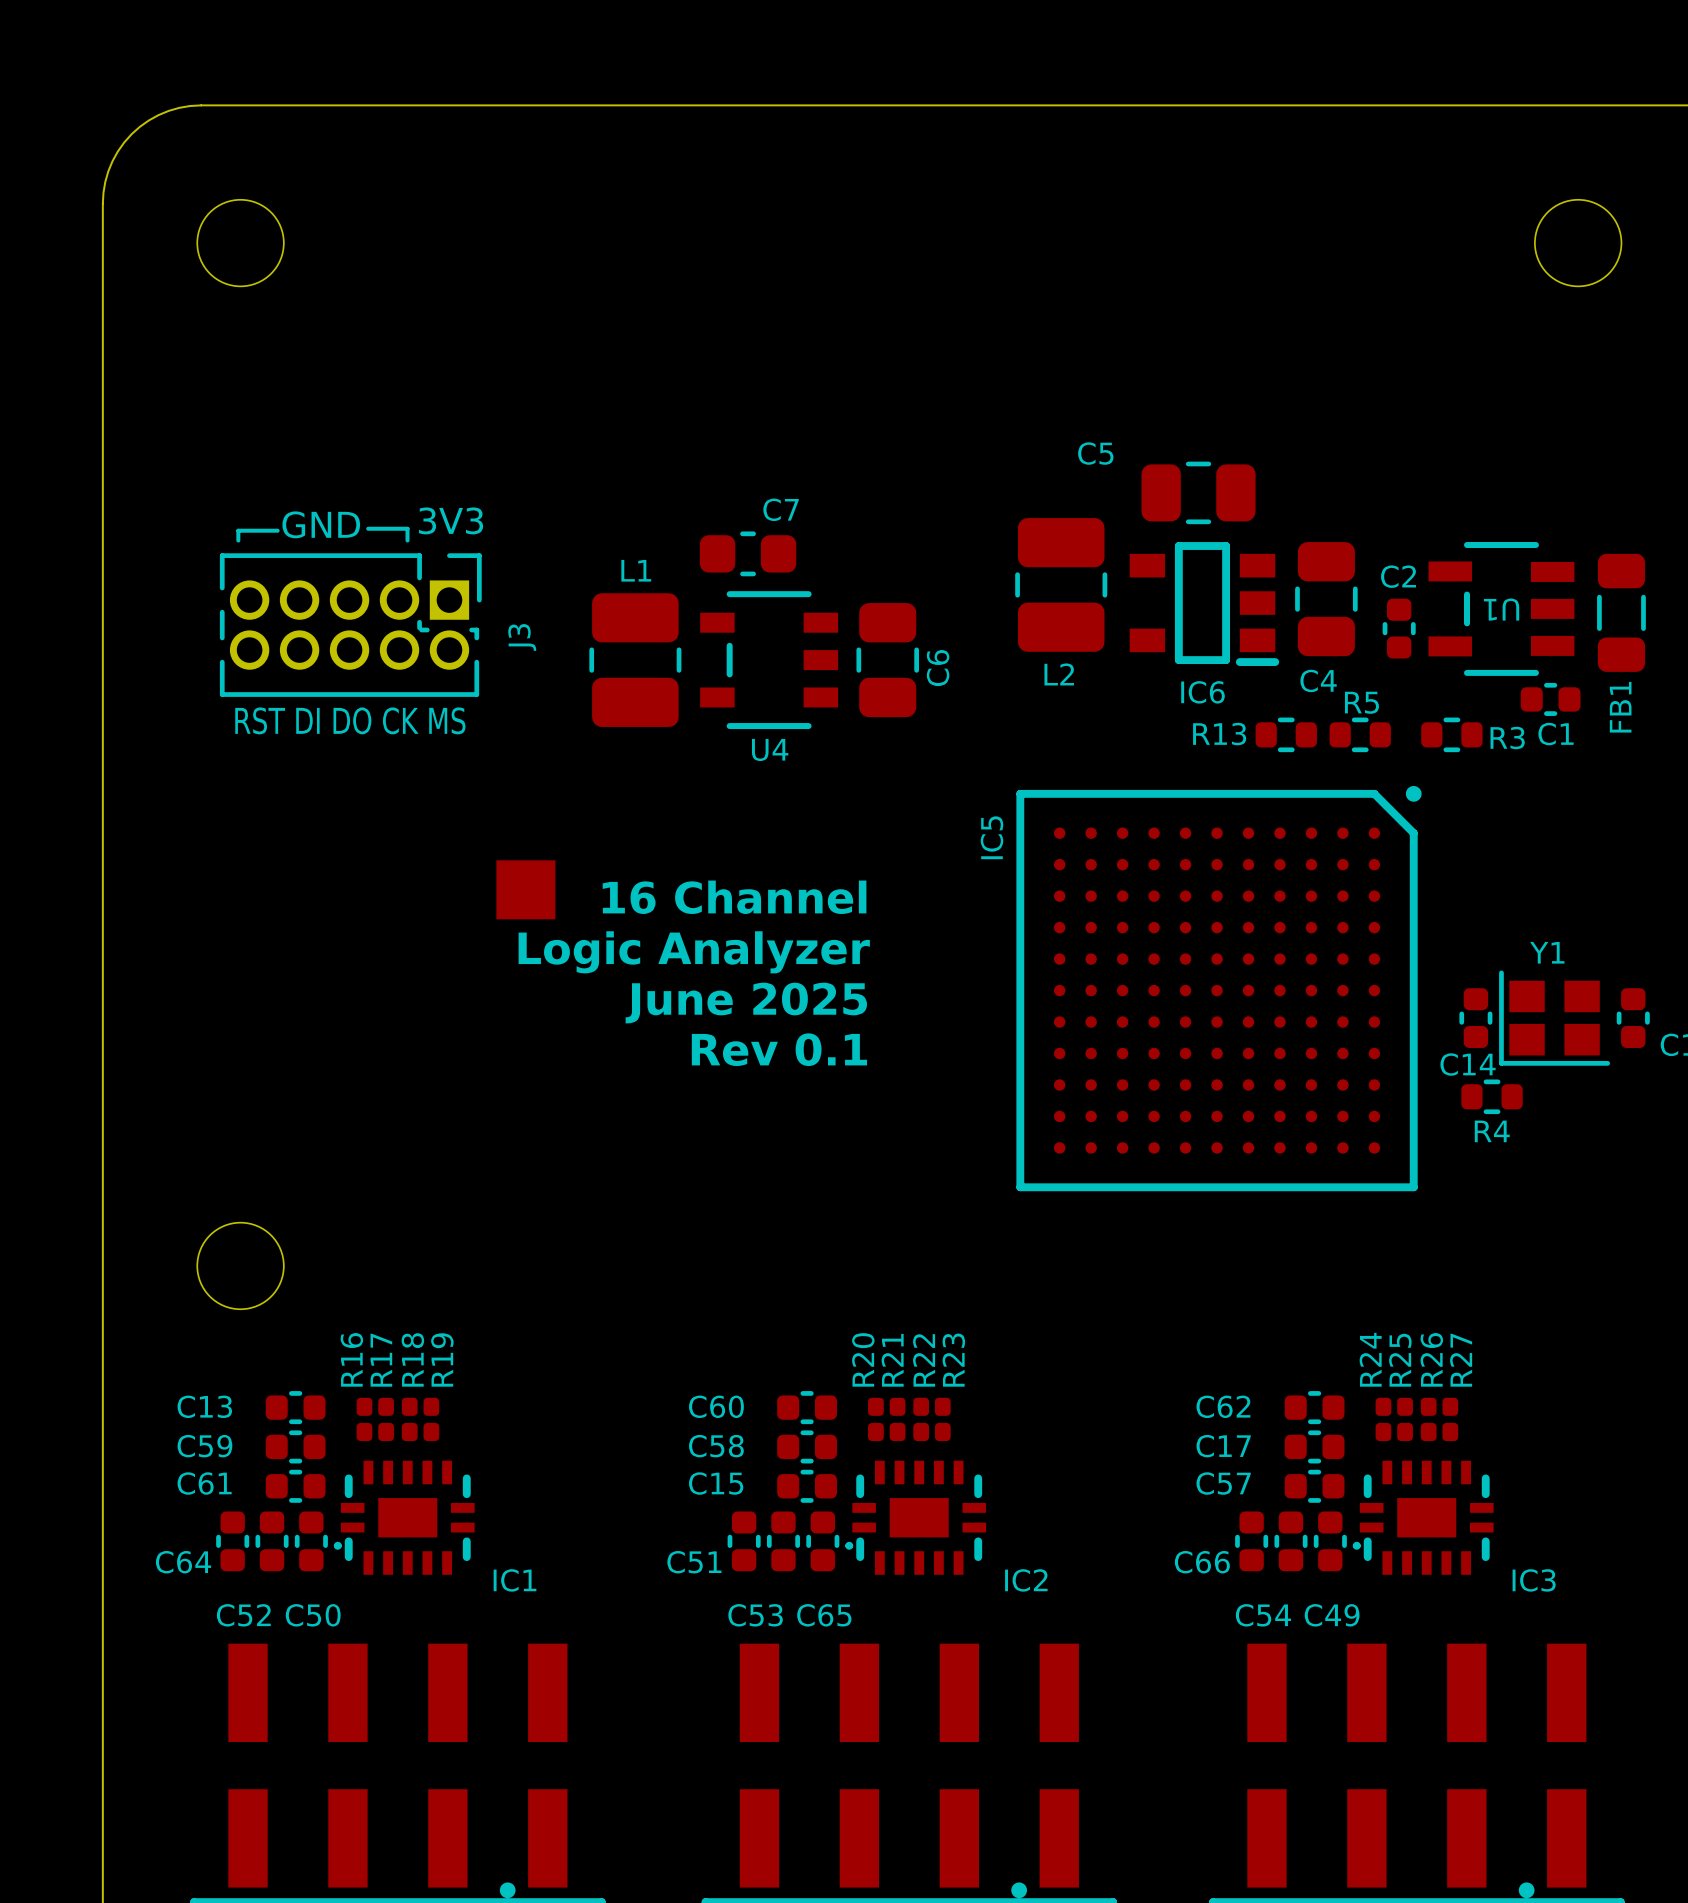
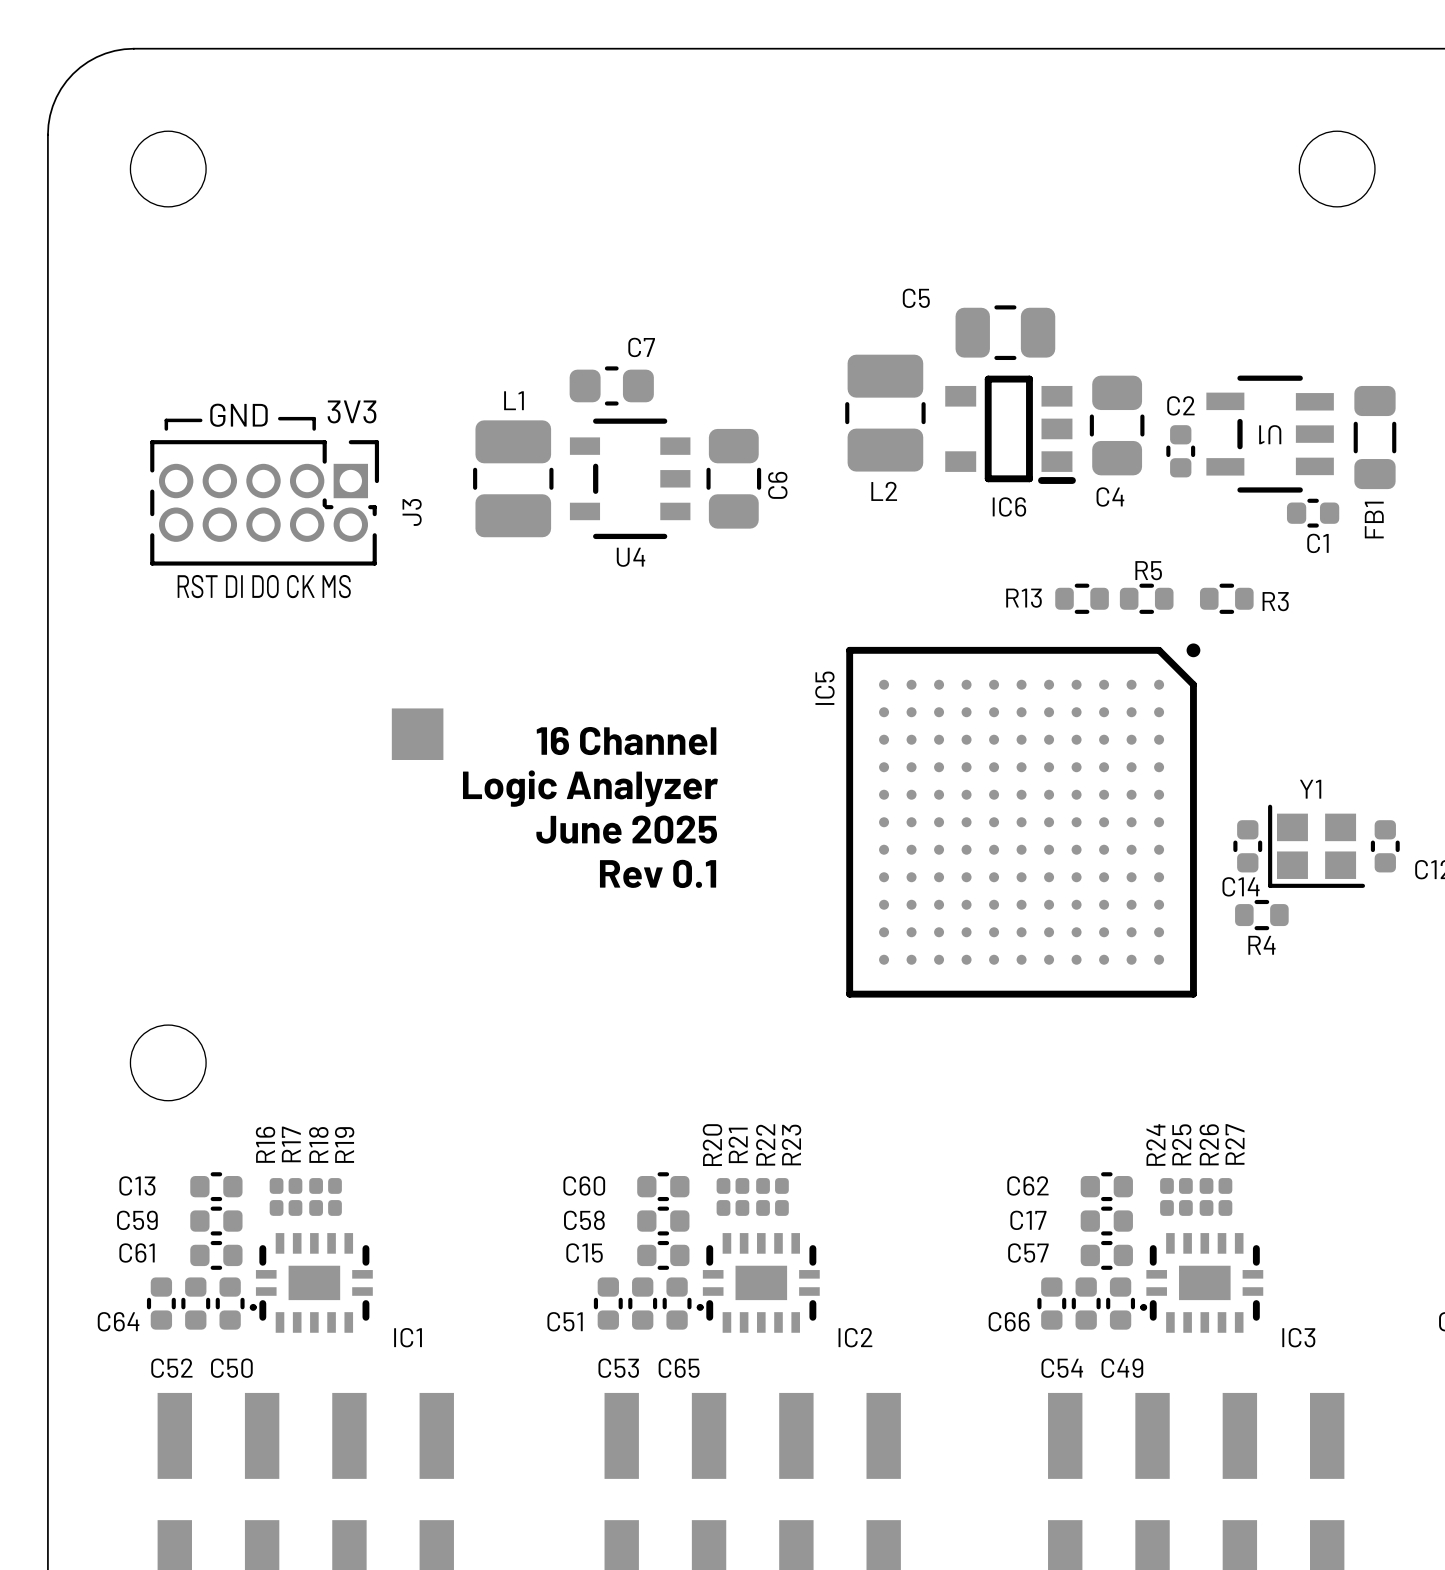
C5 position: (1198, 492) -> (1005, 332)
C7 position: (748, 553) -> (611, 385)
L2 position: (1061, 584) -> (885, 413)
C4 position: (1326, 599) -> (1117, 425)
IC6 position: (1204, 604) -> (1010, 429)
U1 position: (1501, 608) -> (1270, 434)
FB1 position: (1621, 612) -> (1374, 437)
C2 position: (1399, 628) -> (1180, 451)
L1 position: (635, 660) -> (513, 478)
U4 position: (769, 660) -> (630, 478)
C6 position: (887, 660) -> (733, 478)
C1 position: (1550, 699) -> (1313, 513)

